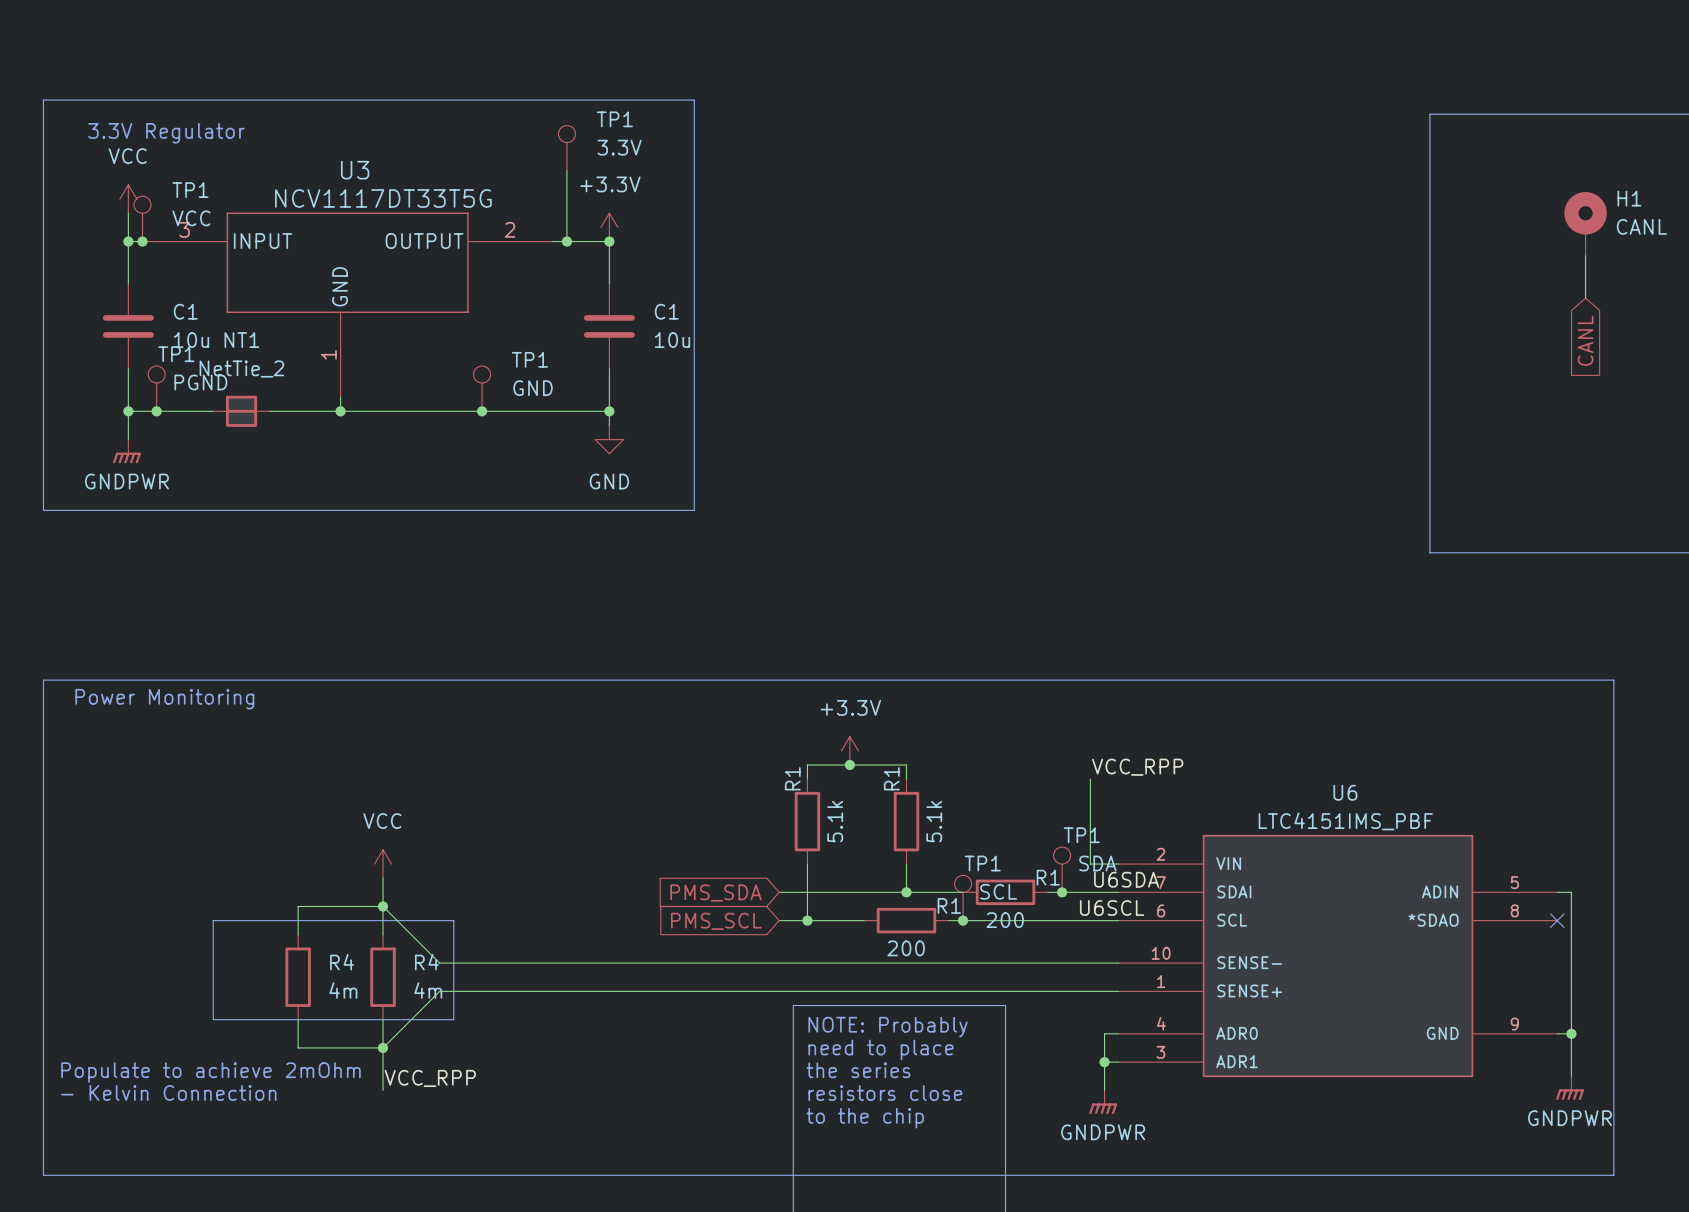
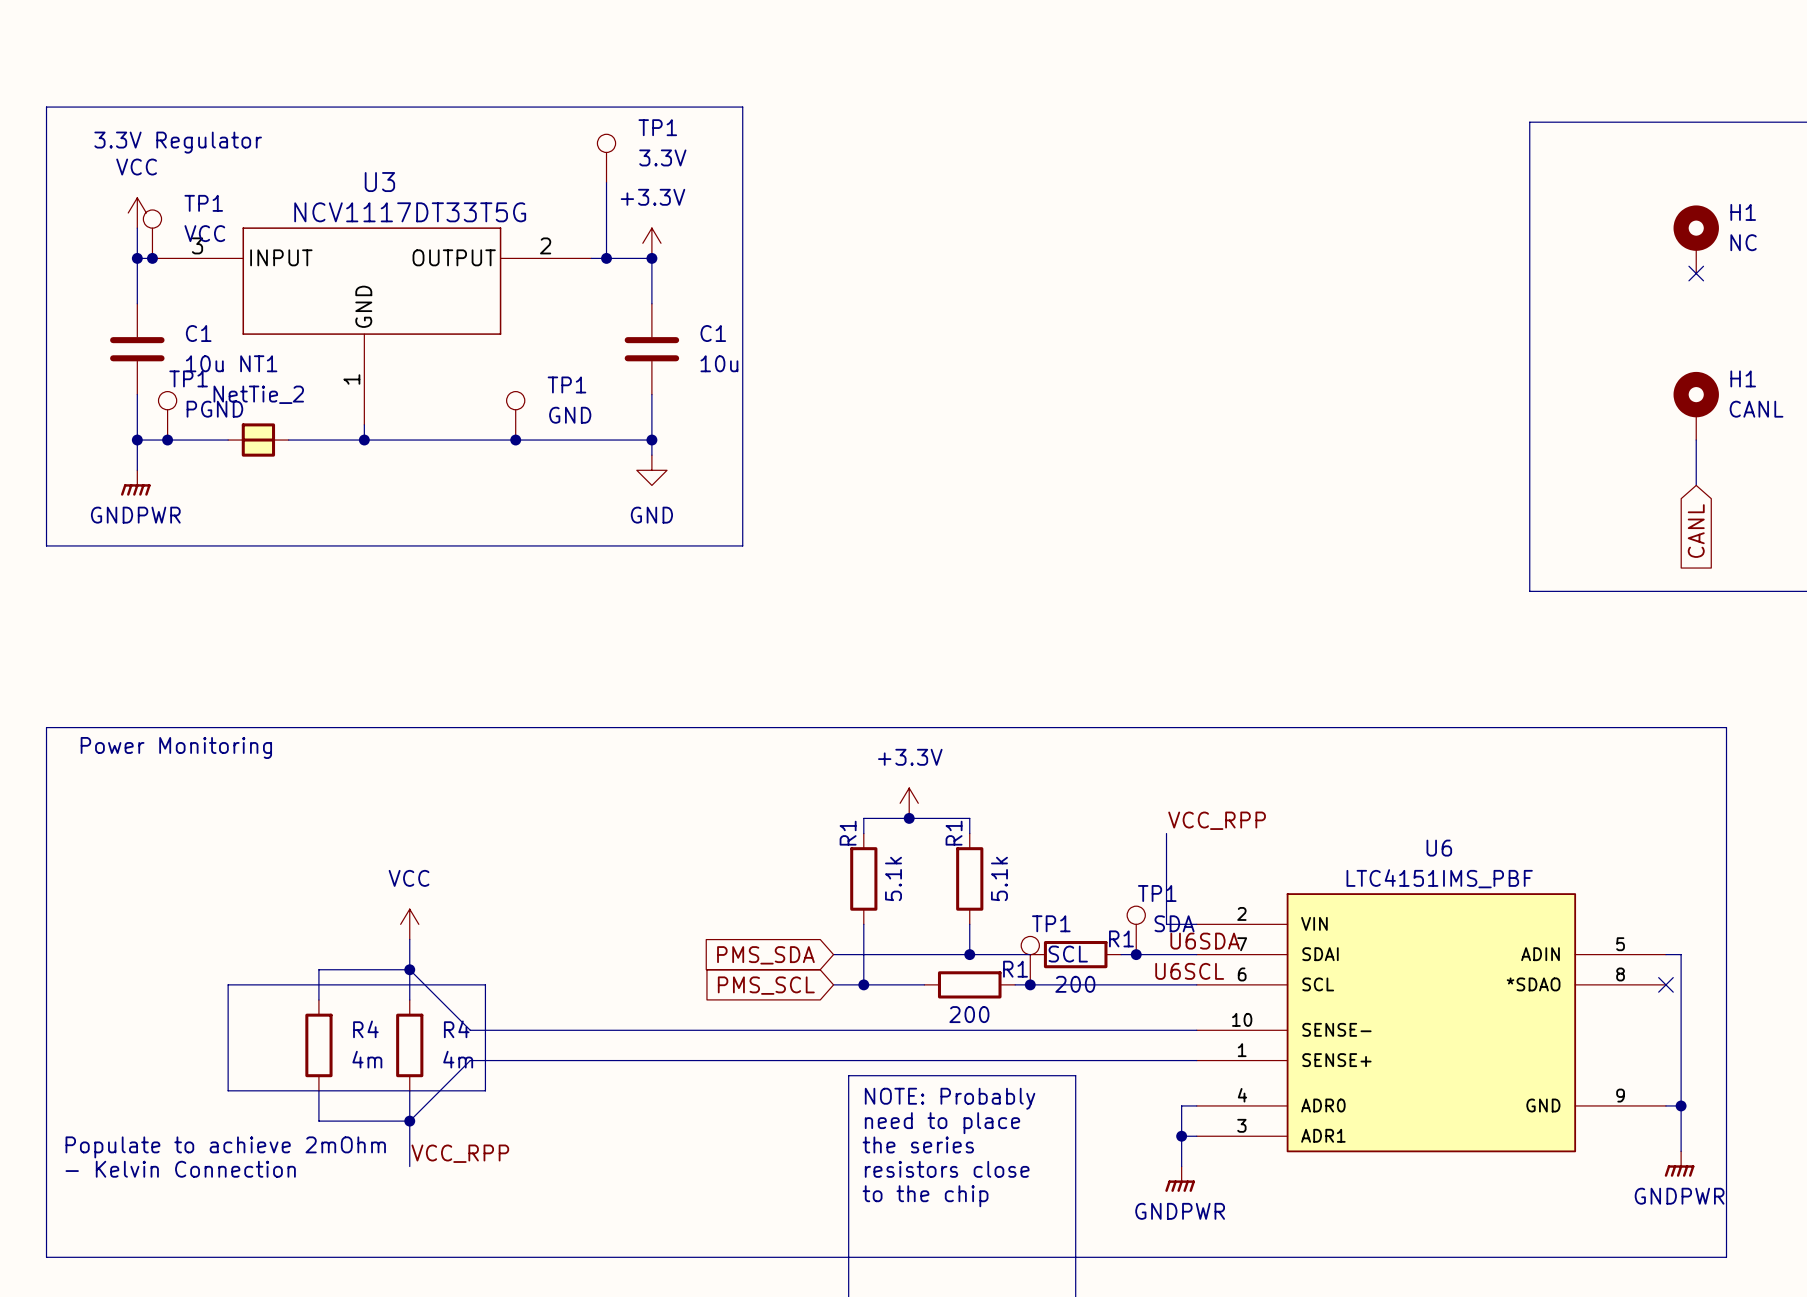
H1 value: CANL (1641, 226) -> NC (1743, 242)
wire: (1585, 255) (1585, 298) -> (1696, 440) (1696, 485)
no-connect mark: none -> (1696, 273)
global label position: CANL (1585, 340) -> CANL (1696, 531)
H1: none -> CANL (1696, 405)

